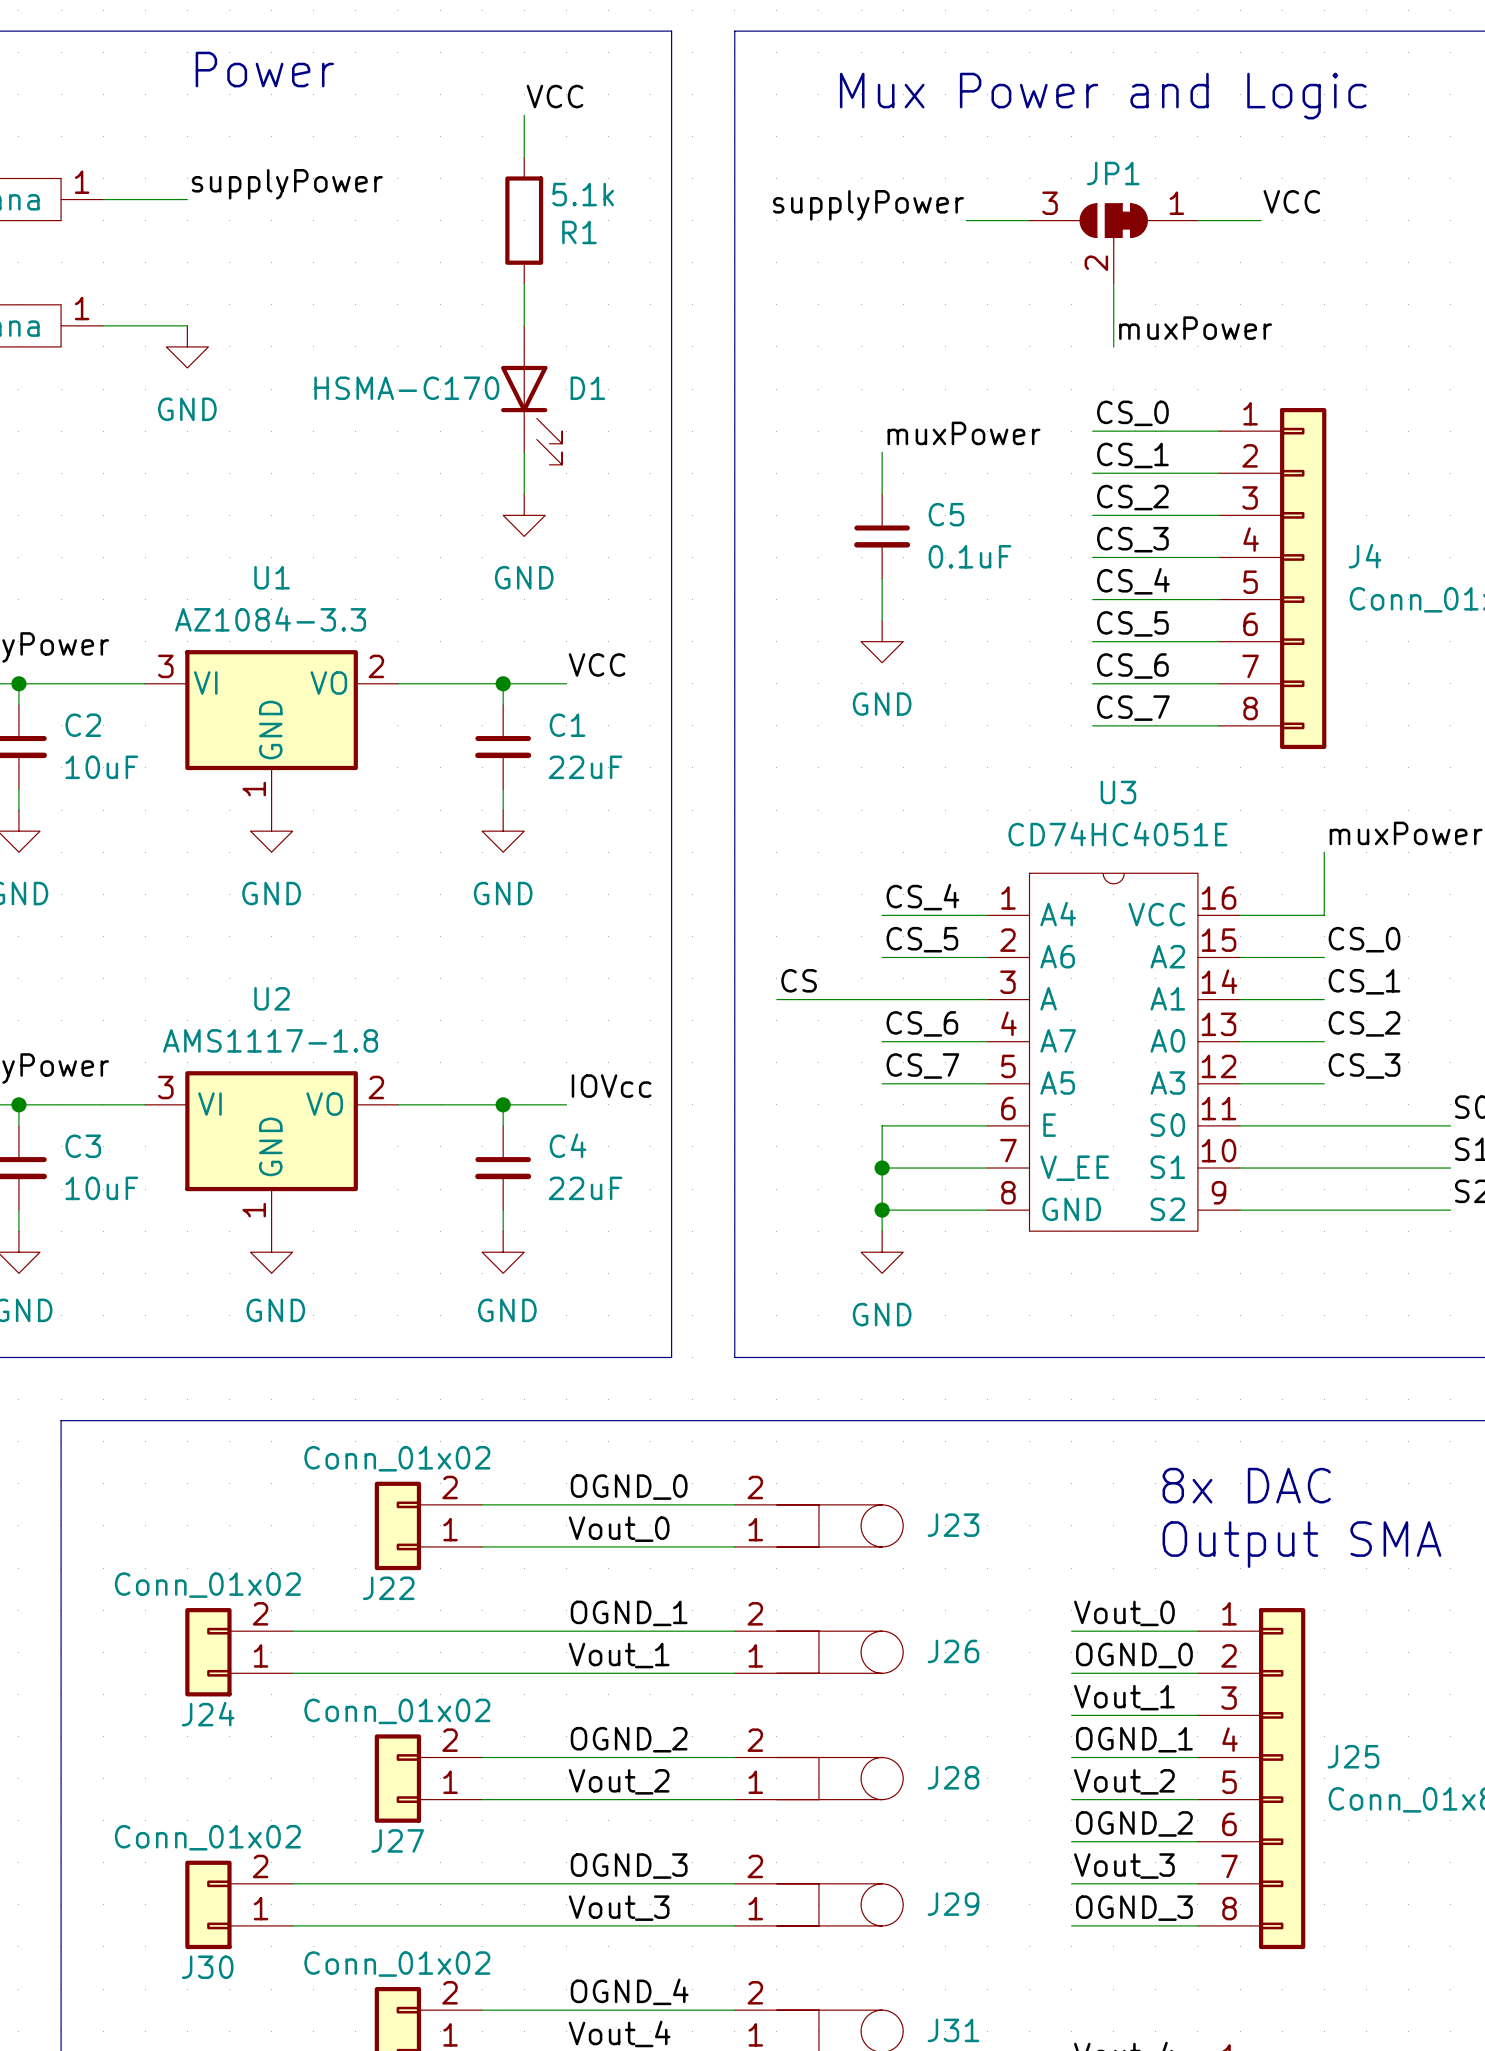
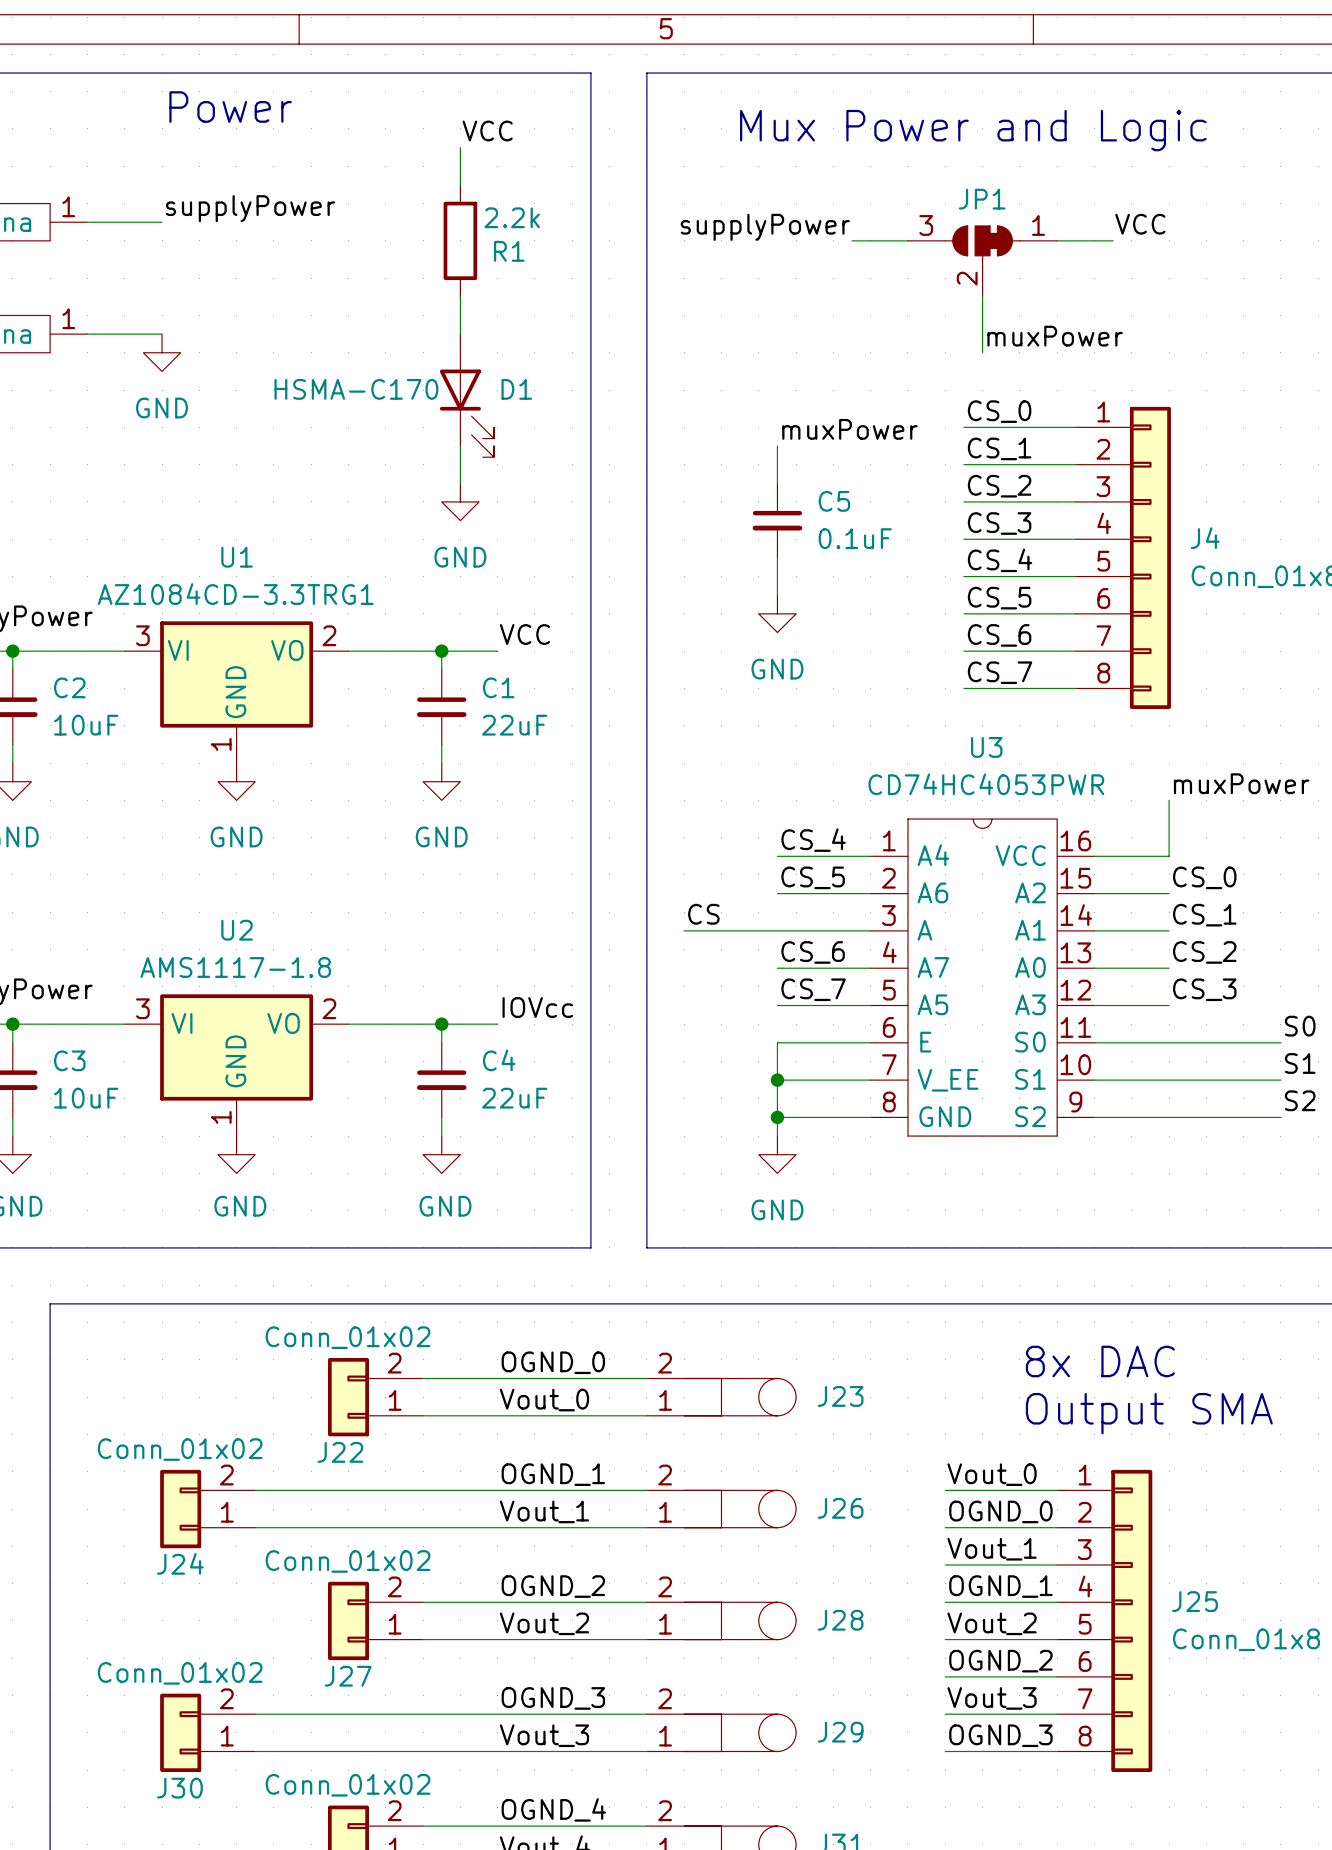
R1 value: 5.1k (583, 194) -> 2.2k (512, 217)
U1 value: AZ1084-3.3 (270, 619) -> AZ1084CD-3.3TRG1 (235, 594)
U3 value: CD74HC4051E (1117, 834) -> CD74HC4053PWR (986, 784)

